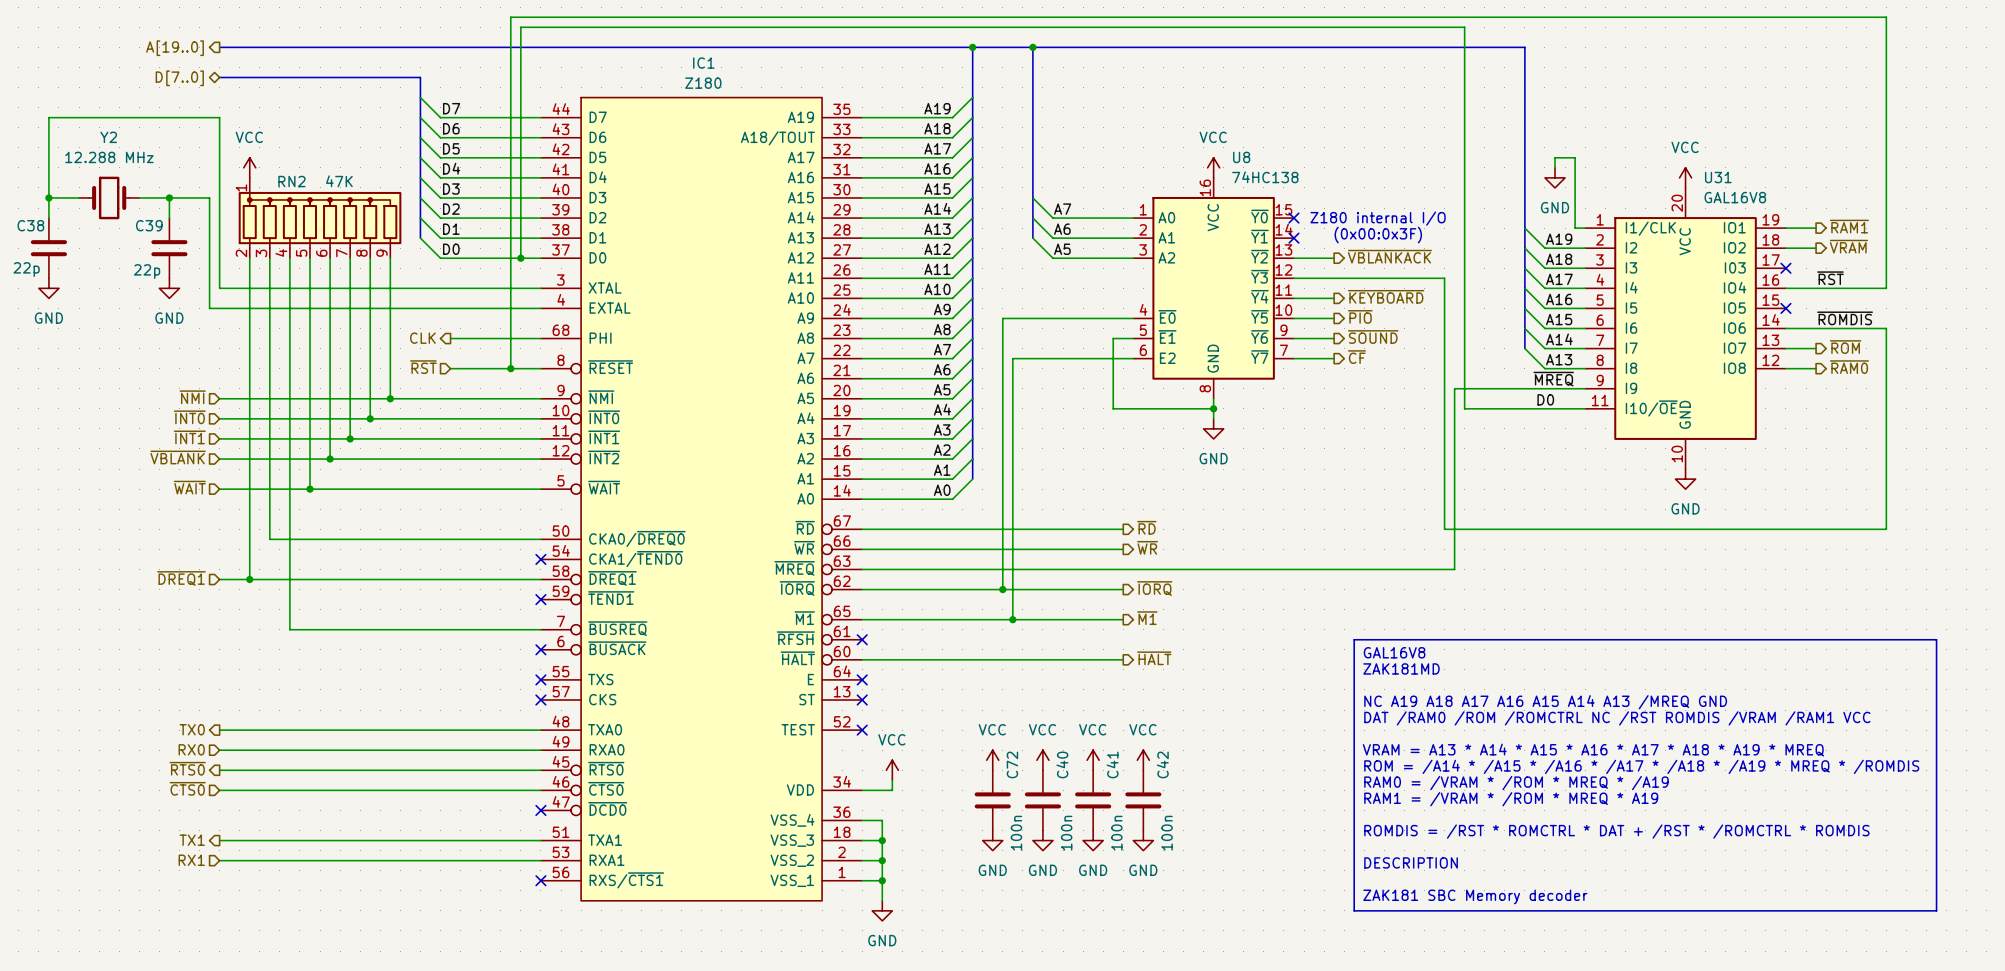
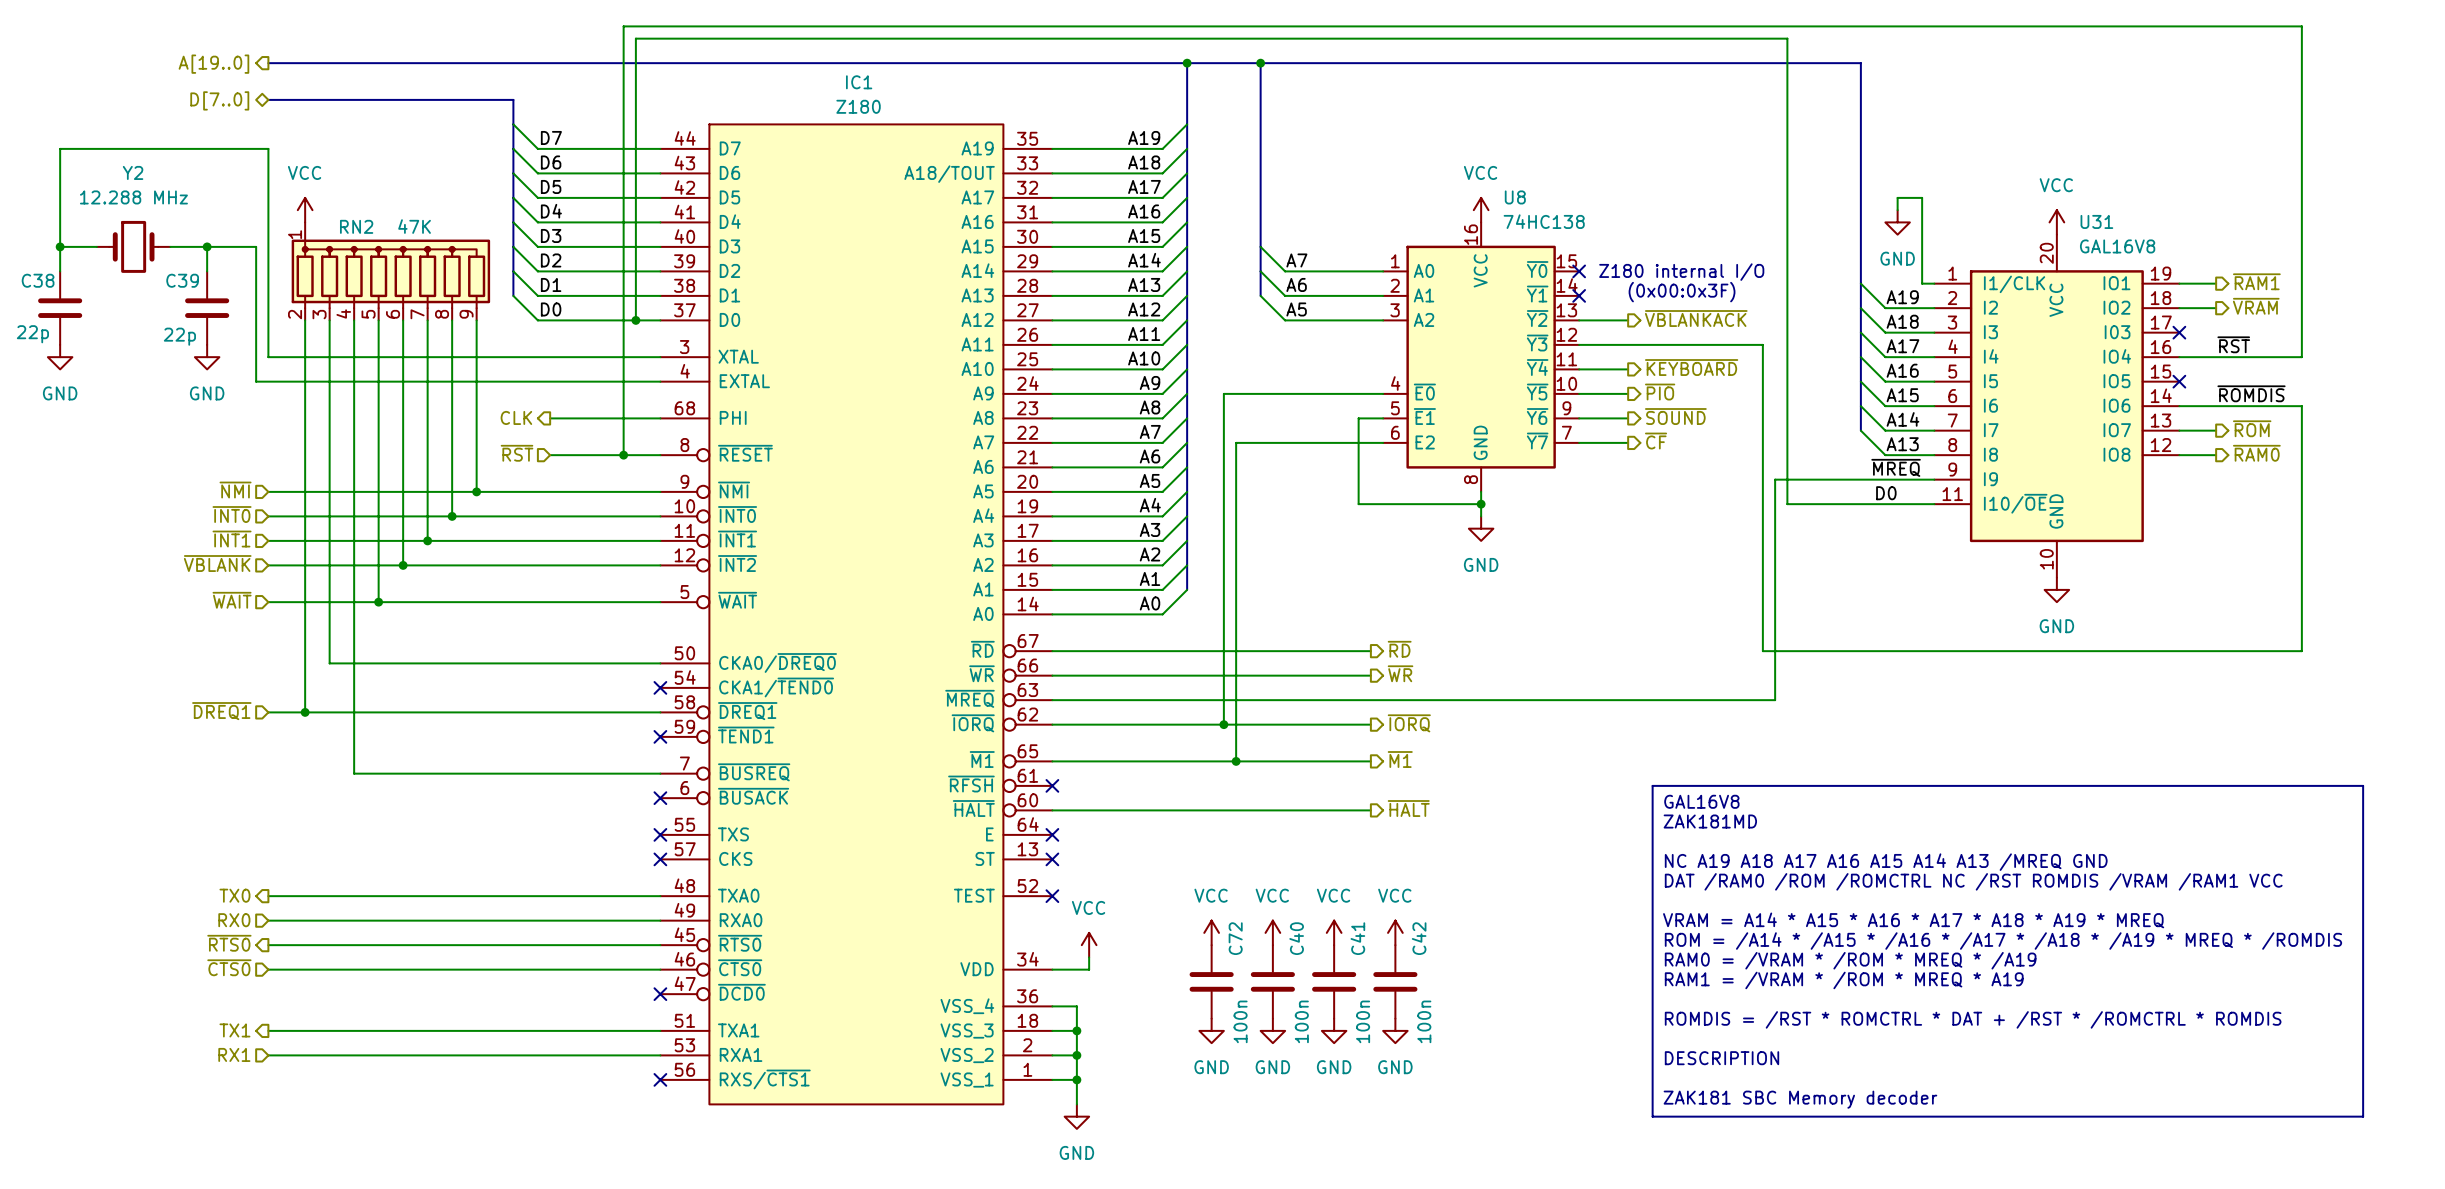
text: VRAM = A13 * A14 * A15 * A16 * A17 * A18 * A19 * MREQ (1593, 750) -> VRAM = A14 * A15 * A16 * A17 * A18 * A19 * MREQ (1913, 920)

